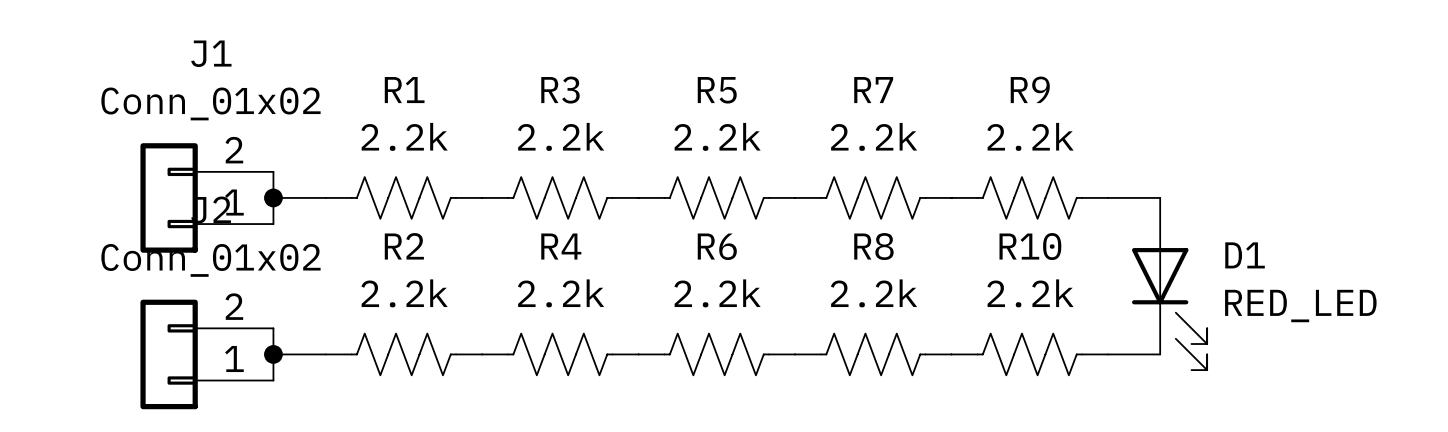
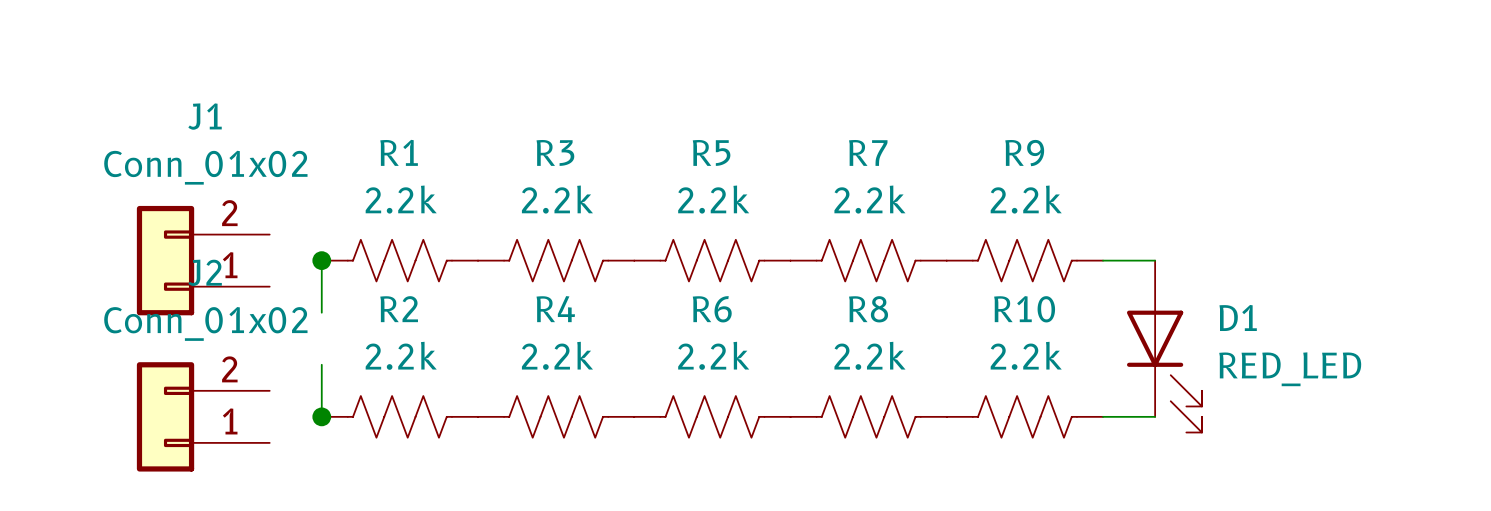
wire: (273, 171) (273, 224) -> none
wire: (273, 197) (325, 197) -> (321, 312) (321, 260)
junction position: (273, 197) -> (321, 260)
wire: (273, 328) (273, 380) -> none
wire: (273, 354) (325, 354) -> (321, 364) (321, 416)
junction position: (273, 354) -> (321, 416)

